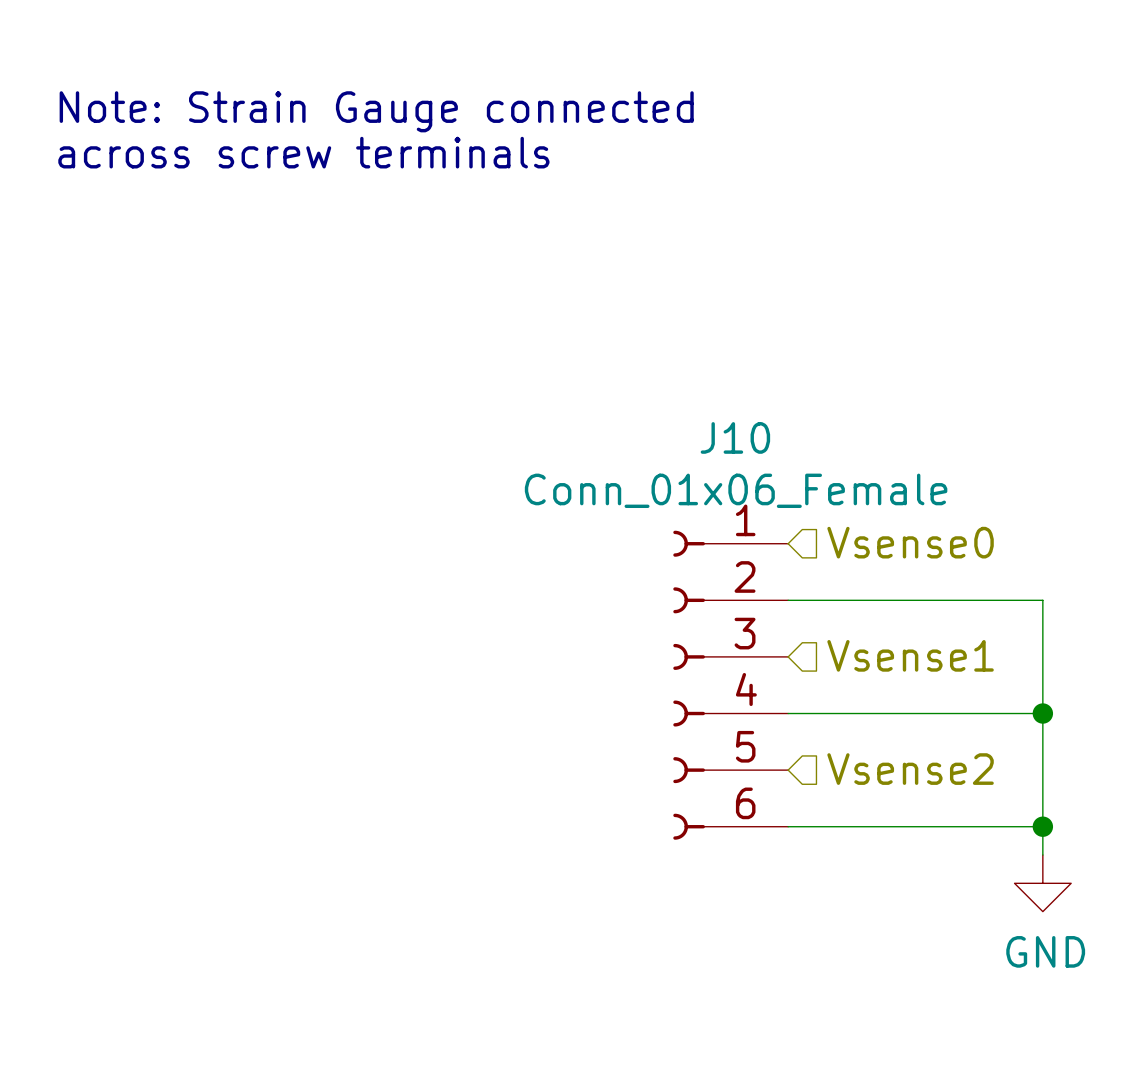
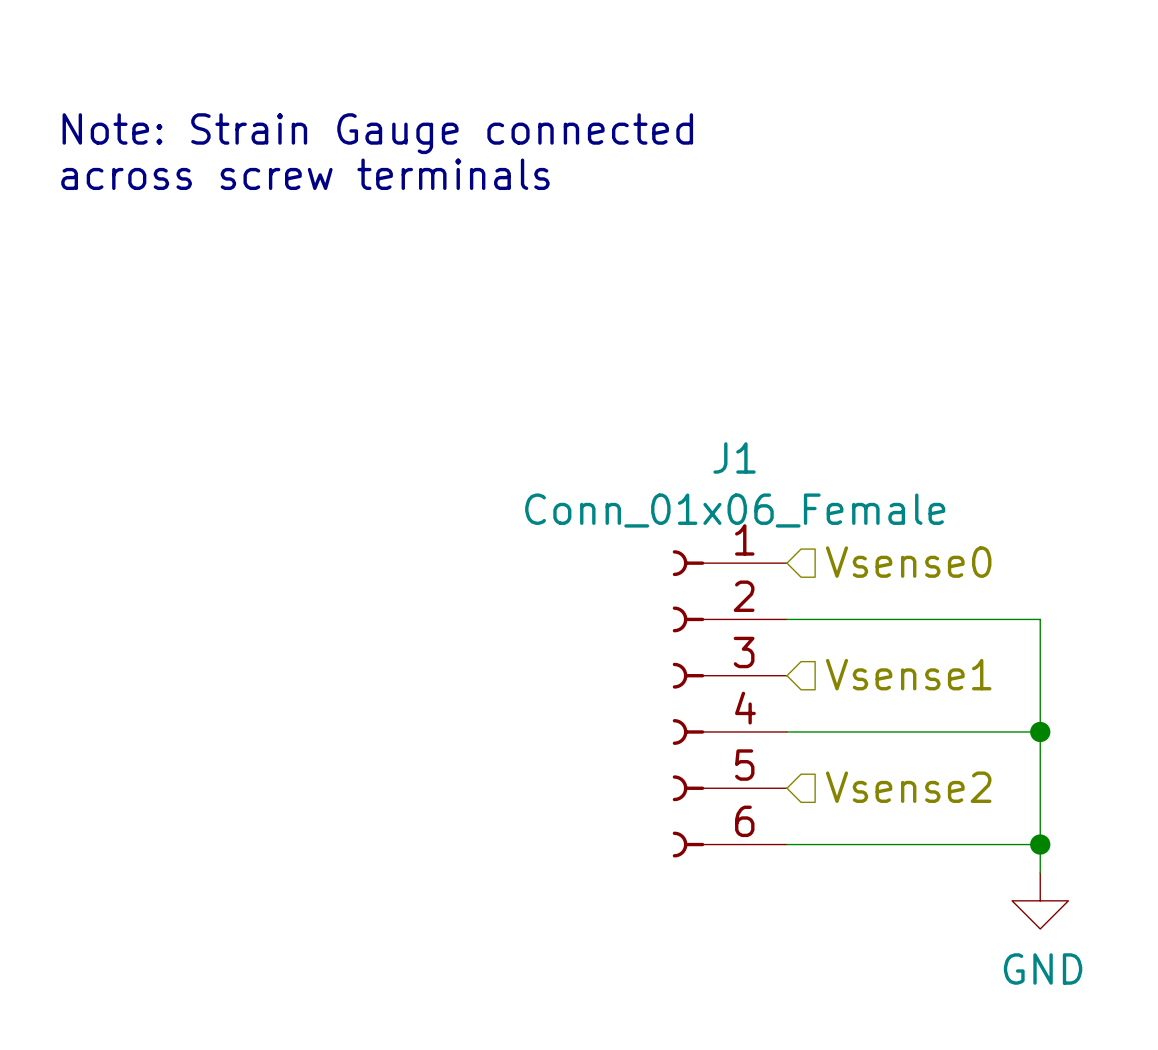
J10 name: J10 (735, 437) -> J1 (734, 457)

